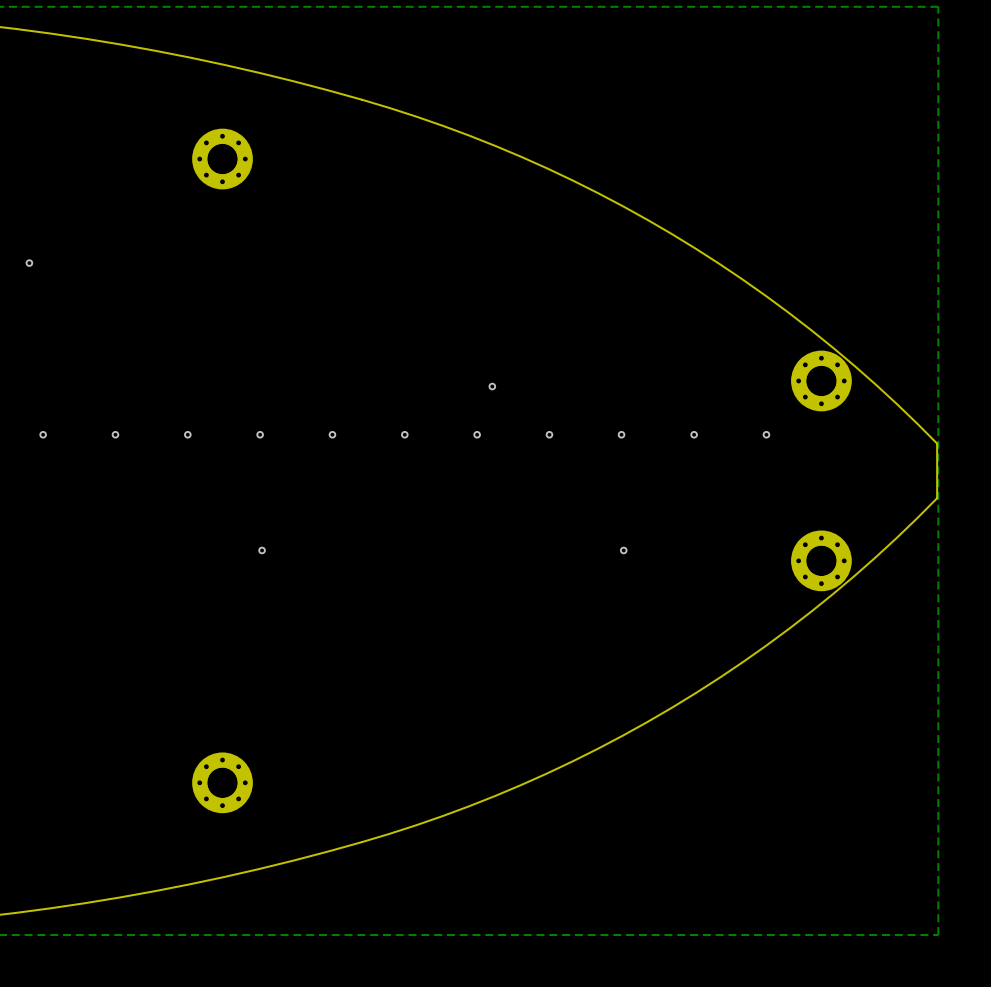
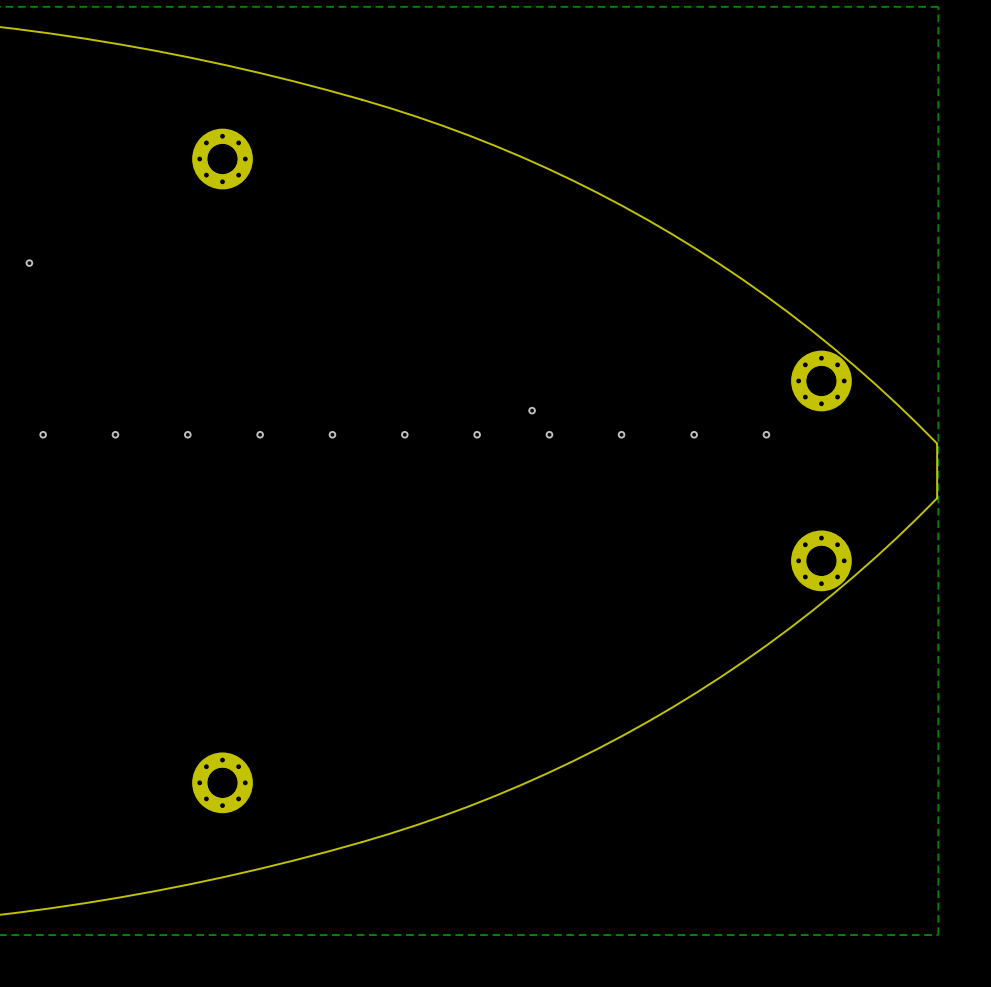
via position: (492, 386) -> (532, 410)
via: (262, 550) -> none
via: (623, 550) -> none

